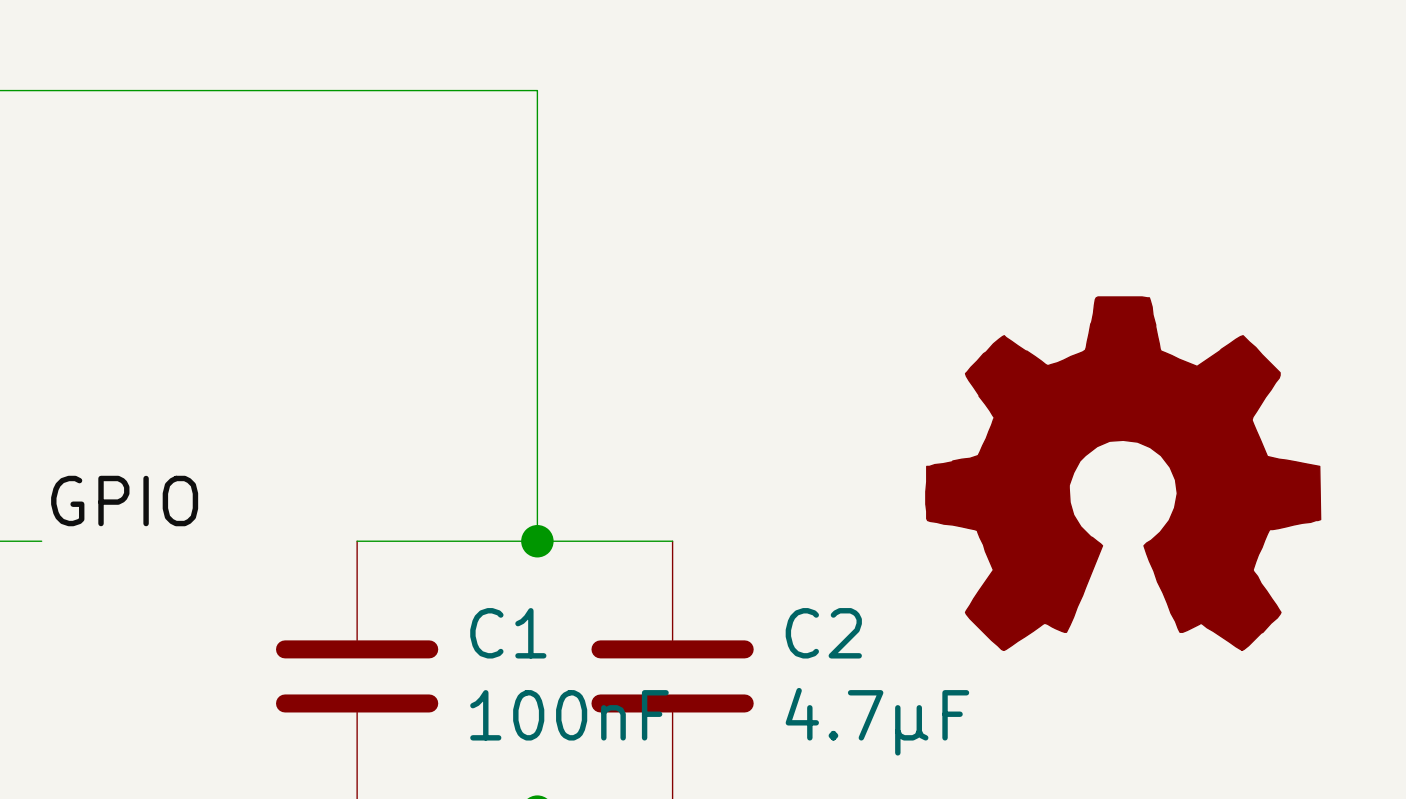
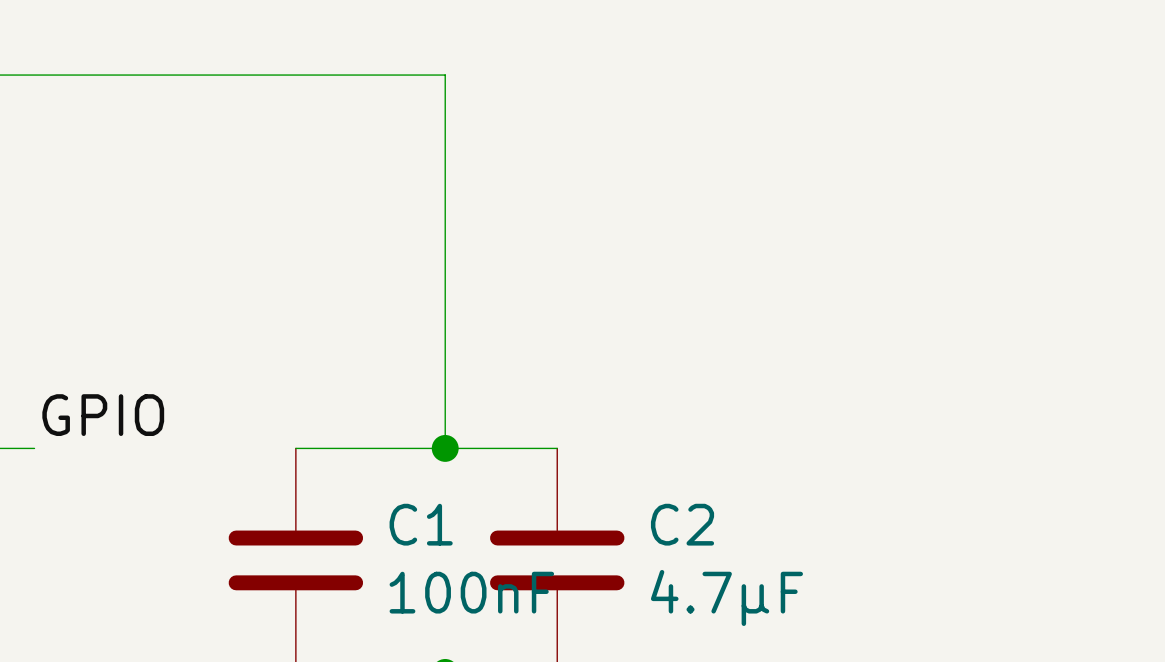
power symbol: (1123, 473) -> none

